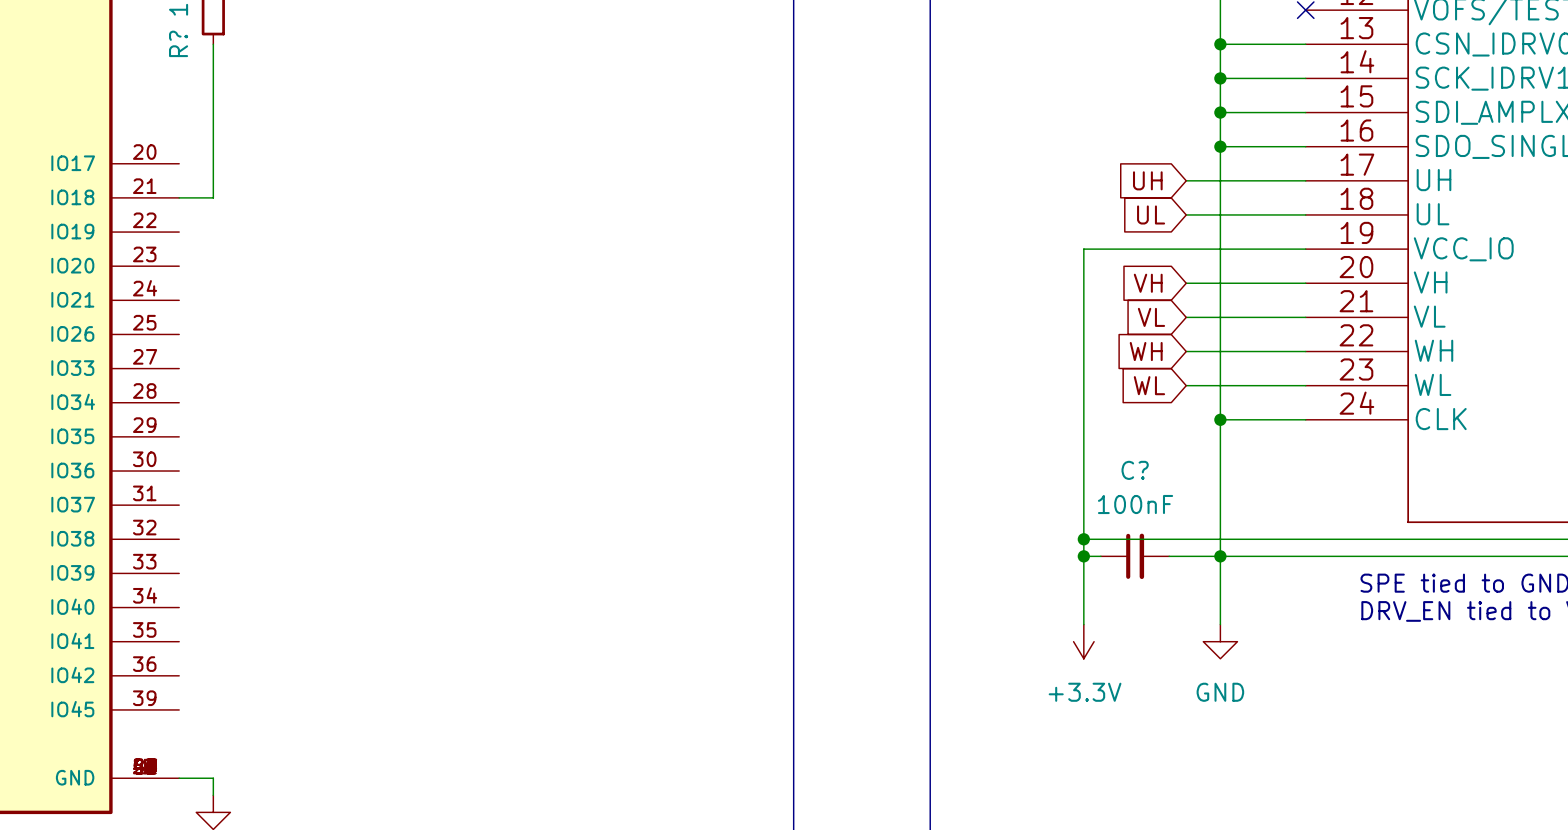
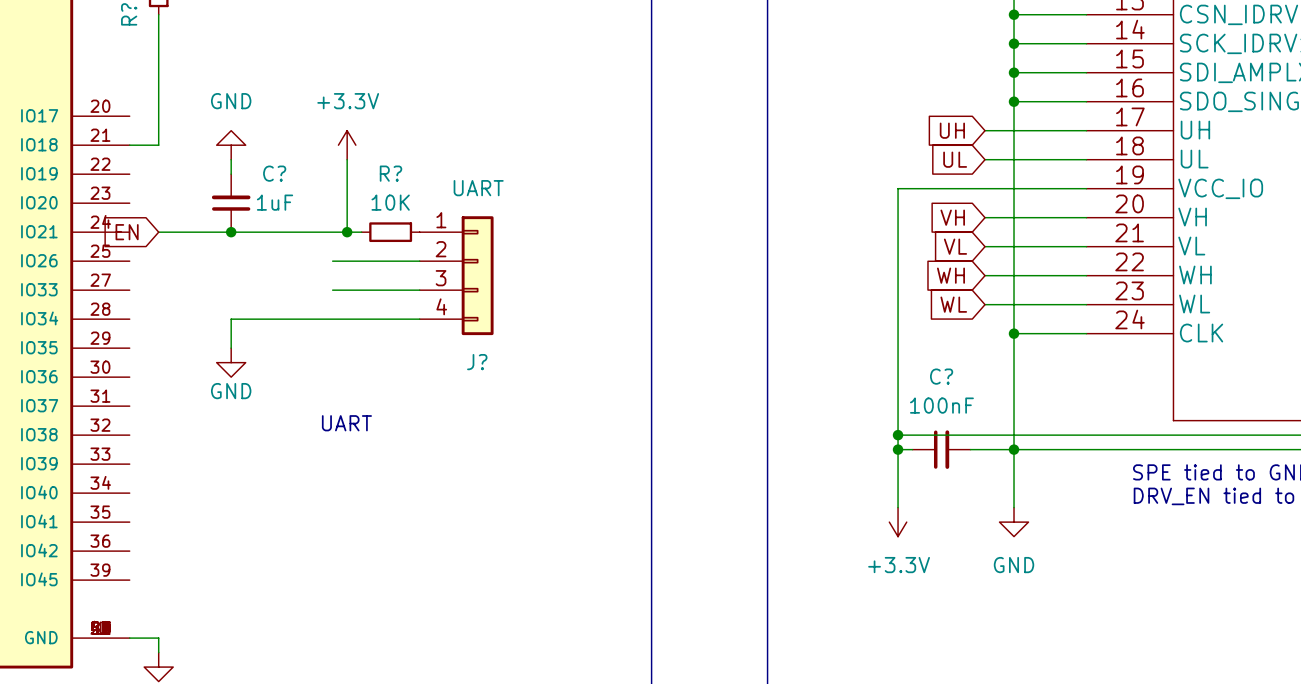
power symbol: none -> GND (231, 145)
power symbol: none -> +3.3V (347, 145)
wire: none -> (231, 159) (231, 174)
wire: none -> (347, 159) (347, 232)
C?: none -> 1uF (231, 203)
global label: none -> EN (127, 232)
wire: none -> (158, 232) (361, 232)
junction: none -> (231, 232)
junction: none -> (347, 232)
R?: none -> 10K (390, 232)
wire: none -> (332, 261) (419, 261)
J?: none -> UART (456, 275)
wire: none -> (332, 290) (419, 290)
wire: none -> (419, 319) (231, 319) (231, 348)
power symbol: none -> GND (231, 362)
text: none -> UART (346, 423)

